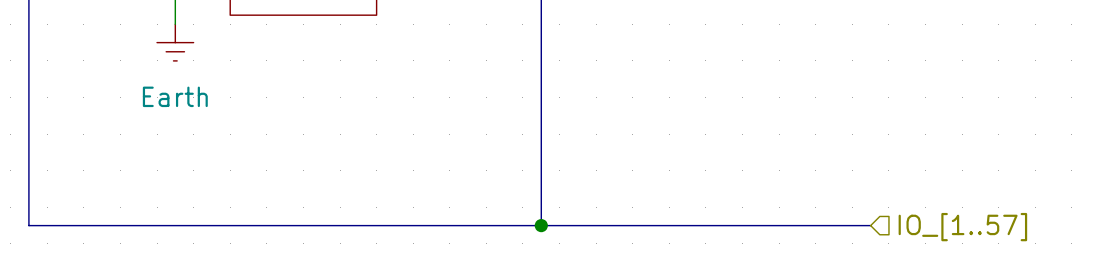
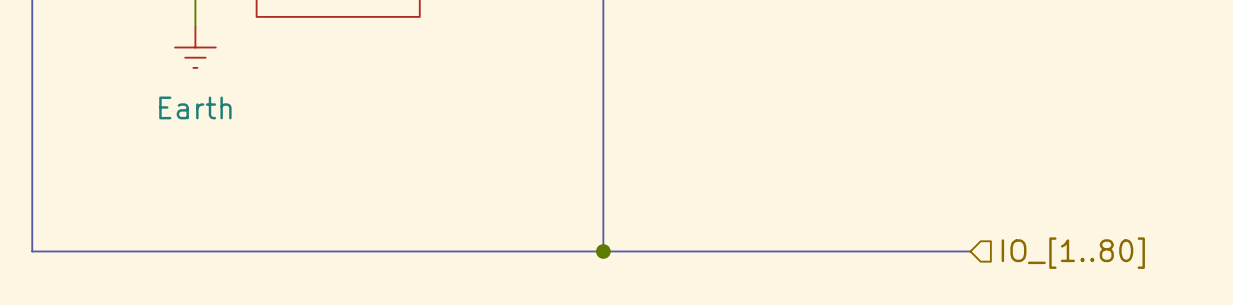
hierarchical label: IO_[1..57] (962, 227) -> IO_[1..80] (1073, 253)

